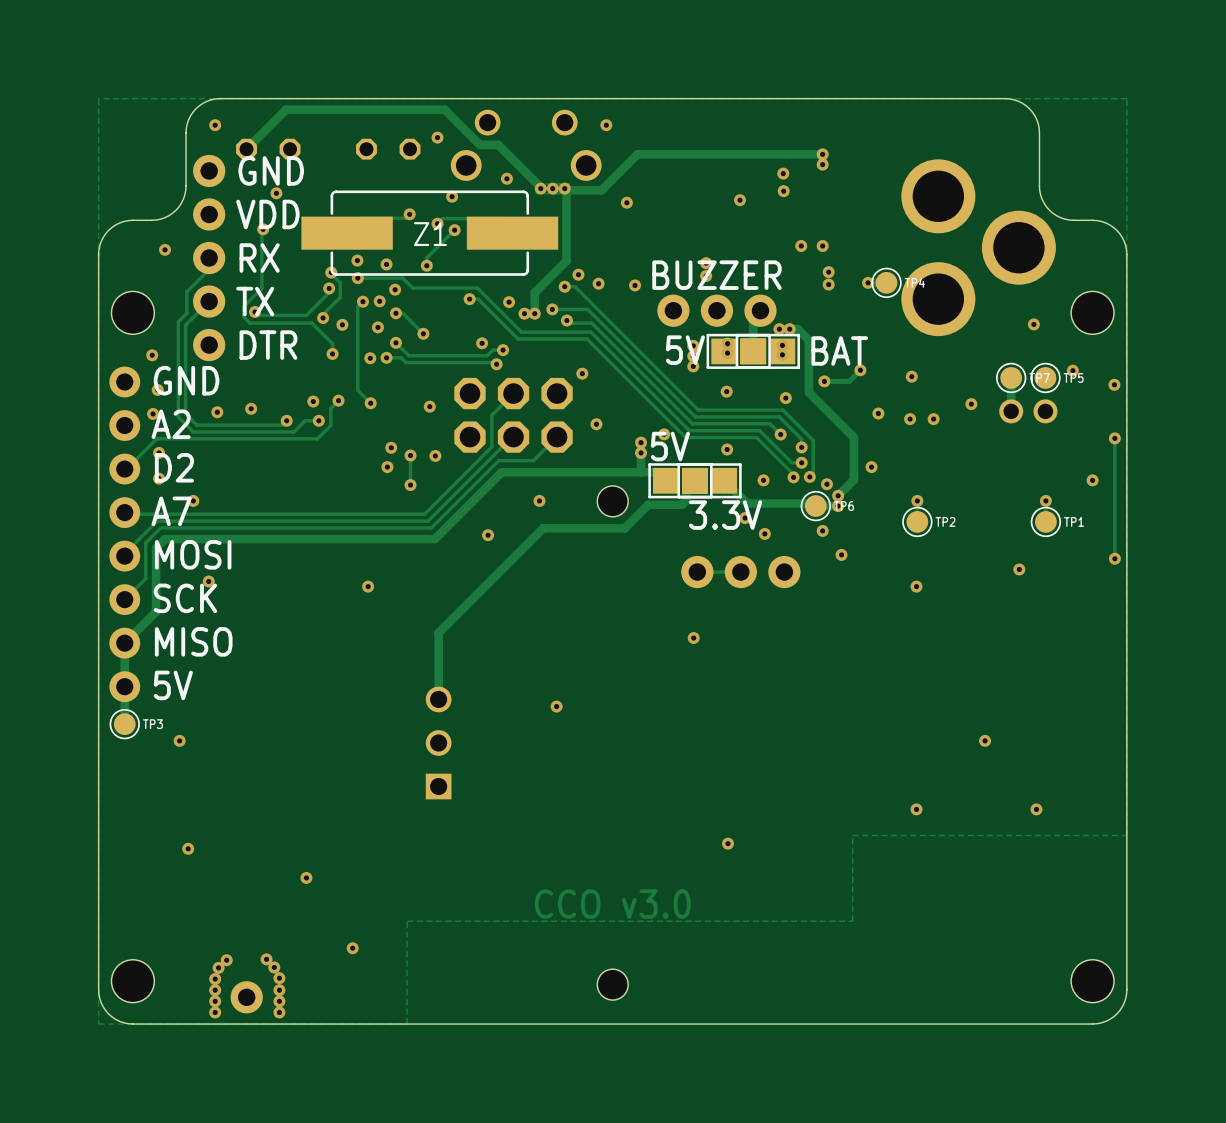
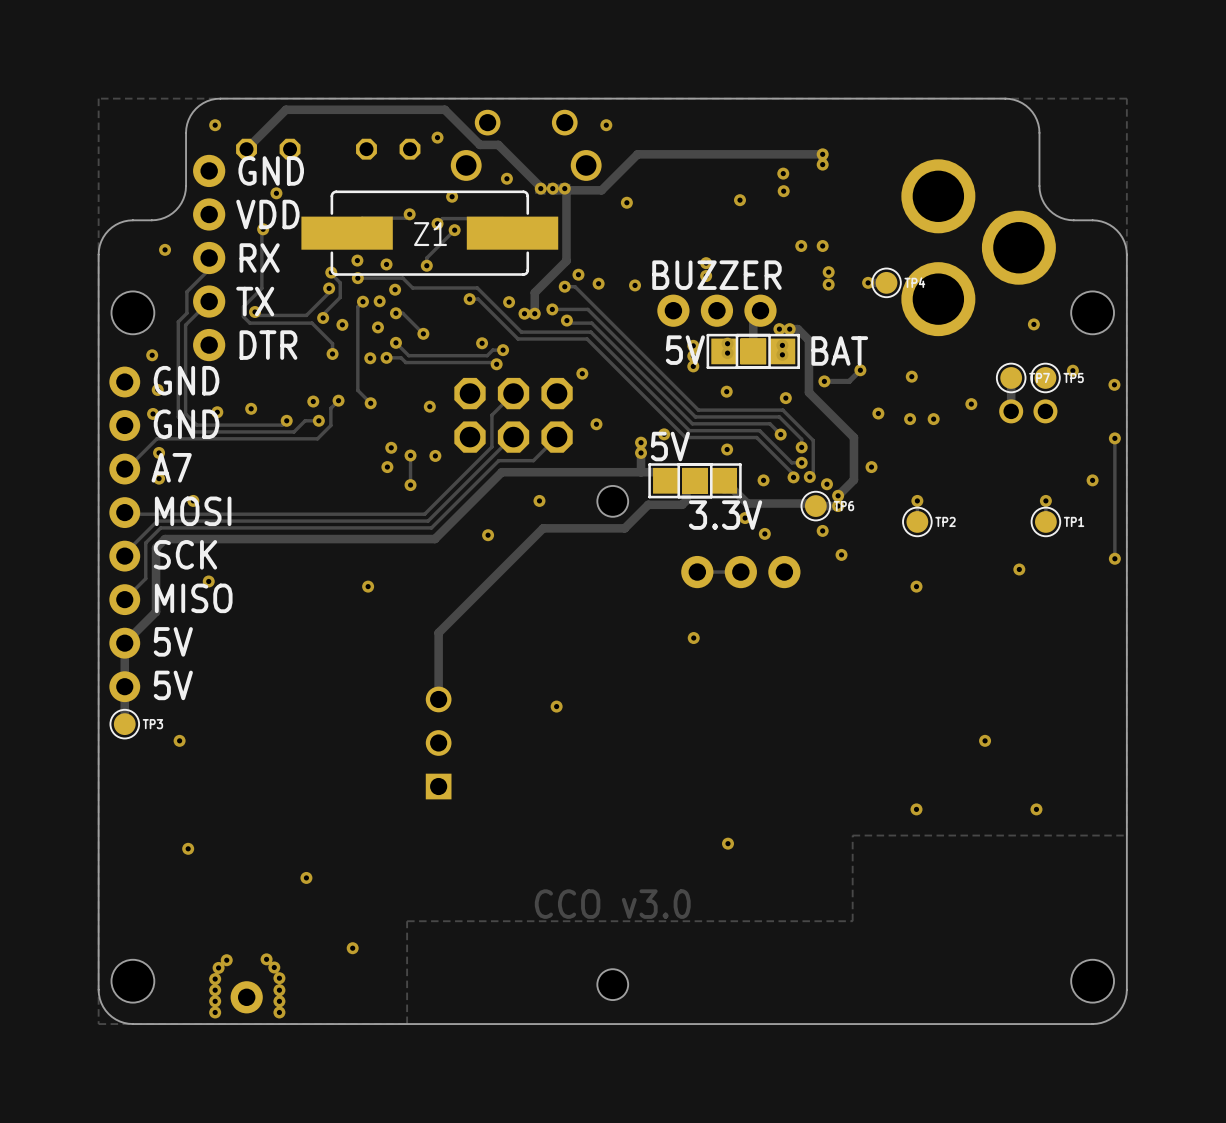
text: A2 (171, 424) -> GND (186, 424)
text: D2 (174, 467) -> A7 (171, 467)
text: A7 (171, 511) -> MOSI (193, 511)
text: MOSI (193, 554) -> SCK (185, 554)
text: SCK (185, 598) -> MISO (193, 598)
text: MISO (193, 641) -> 5V (173, 641)

